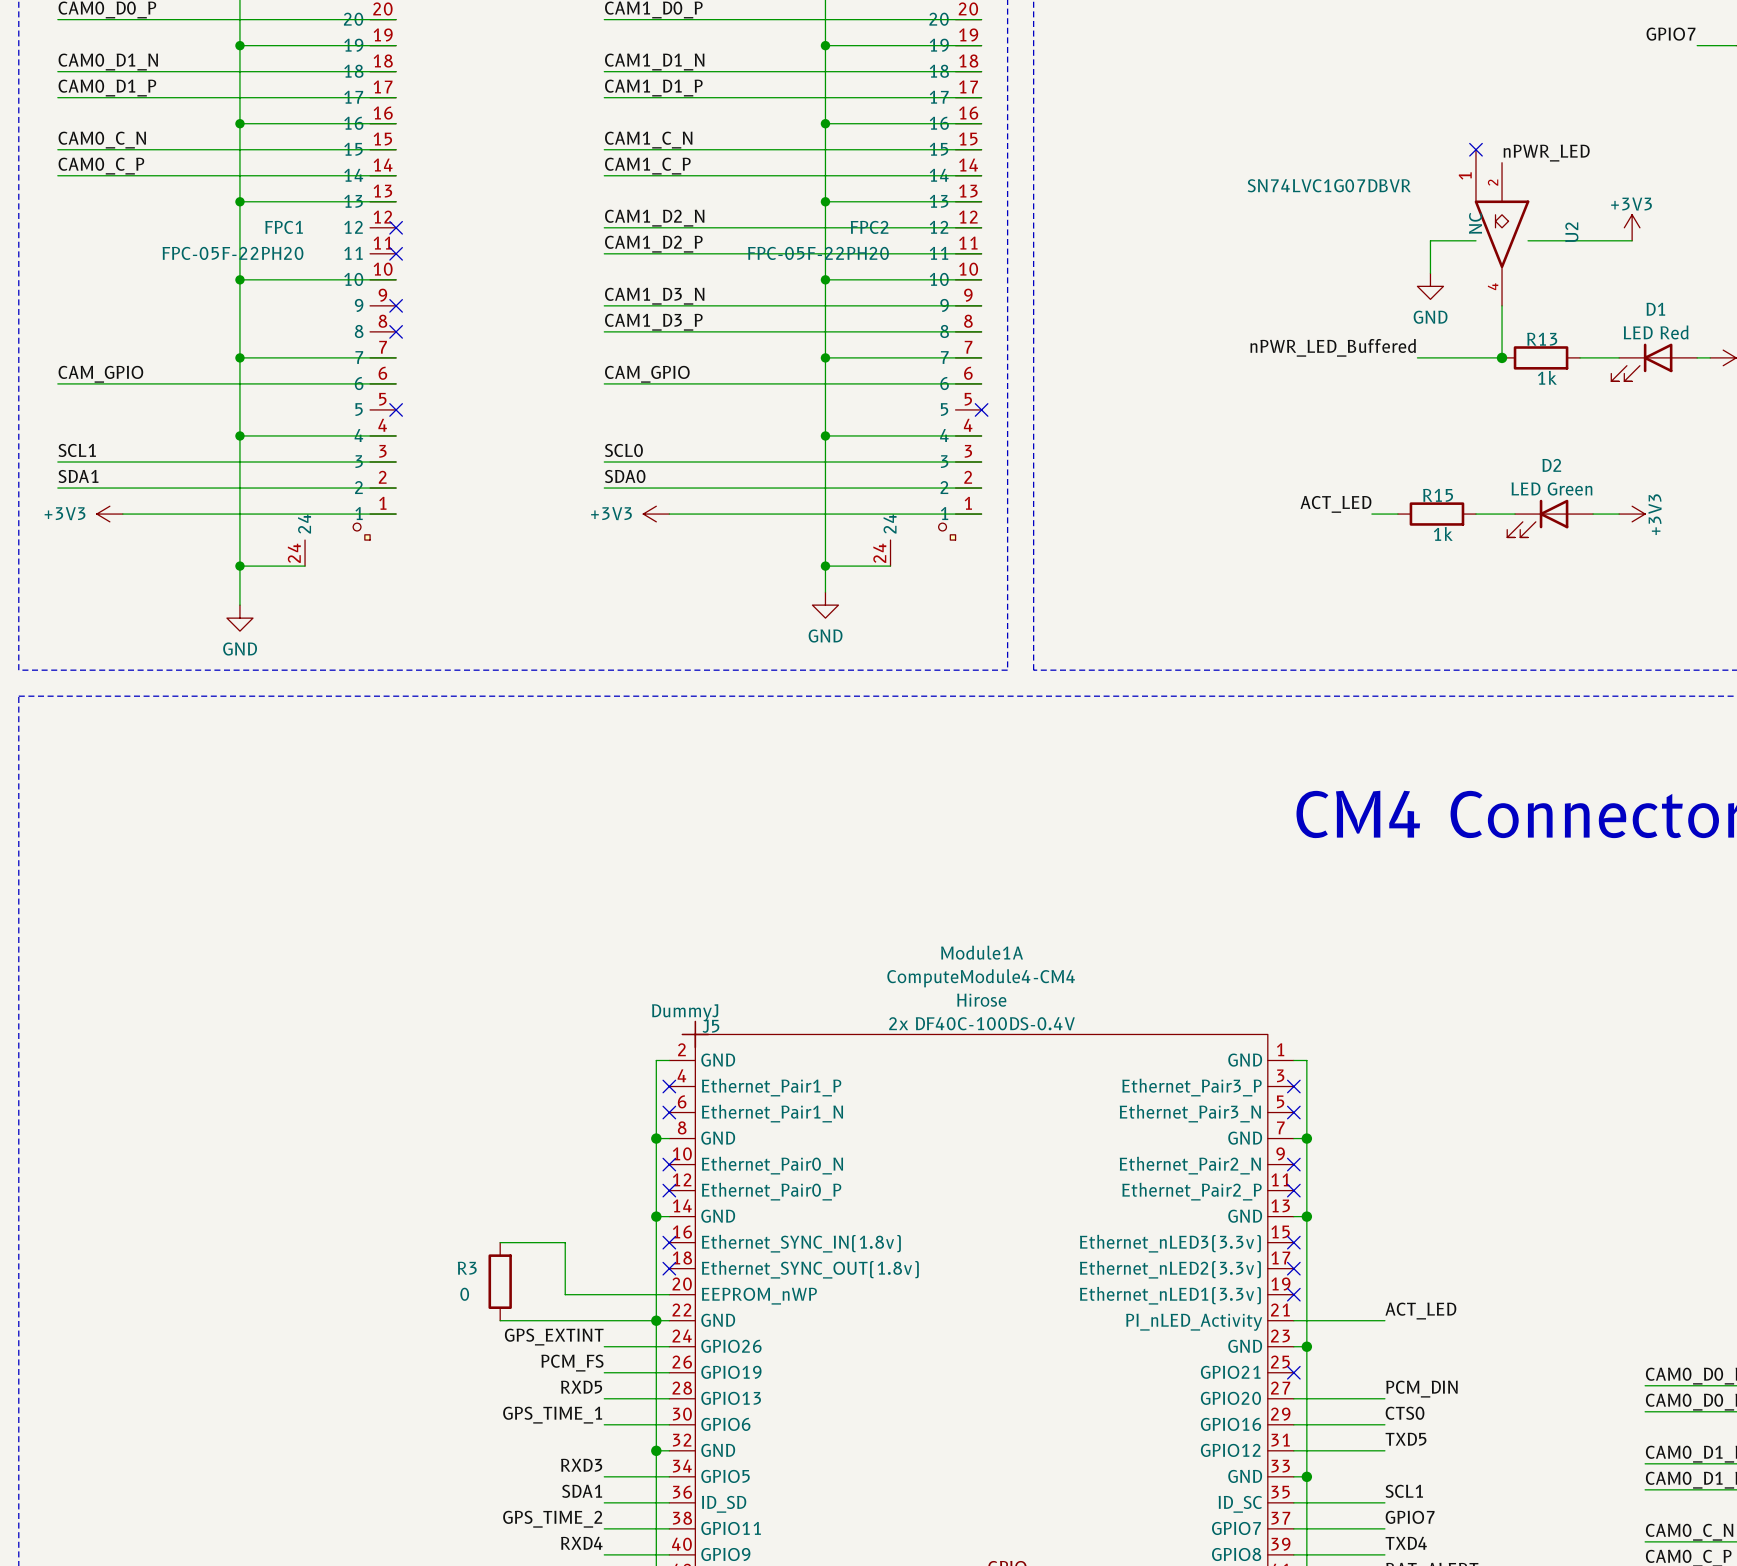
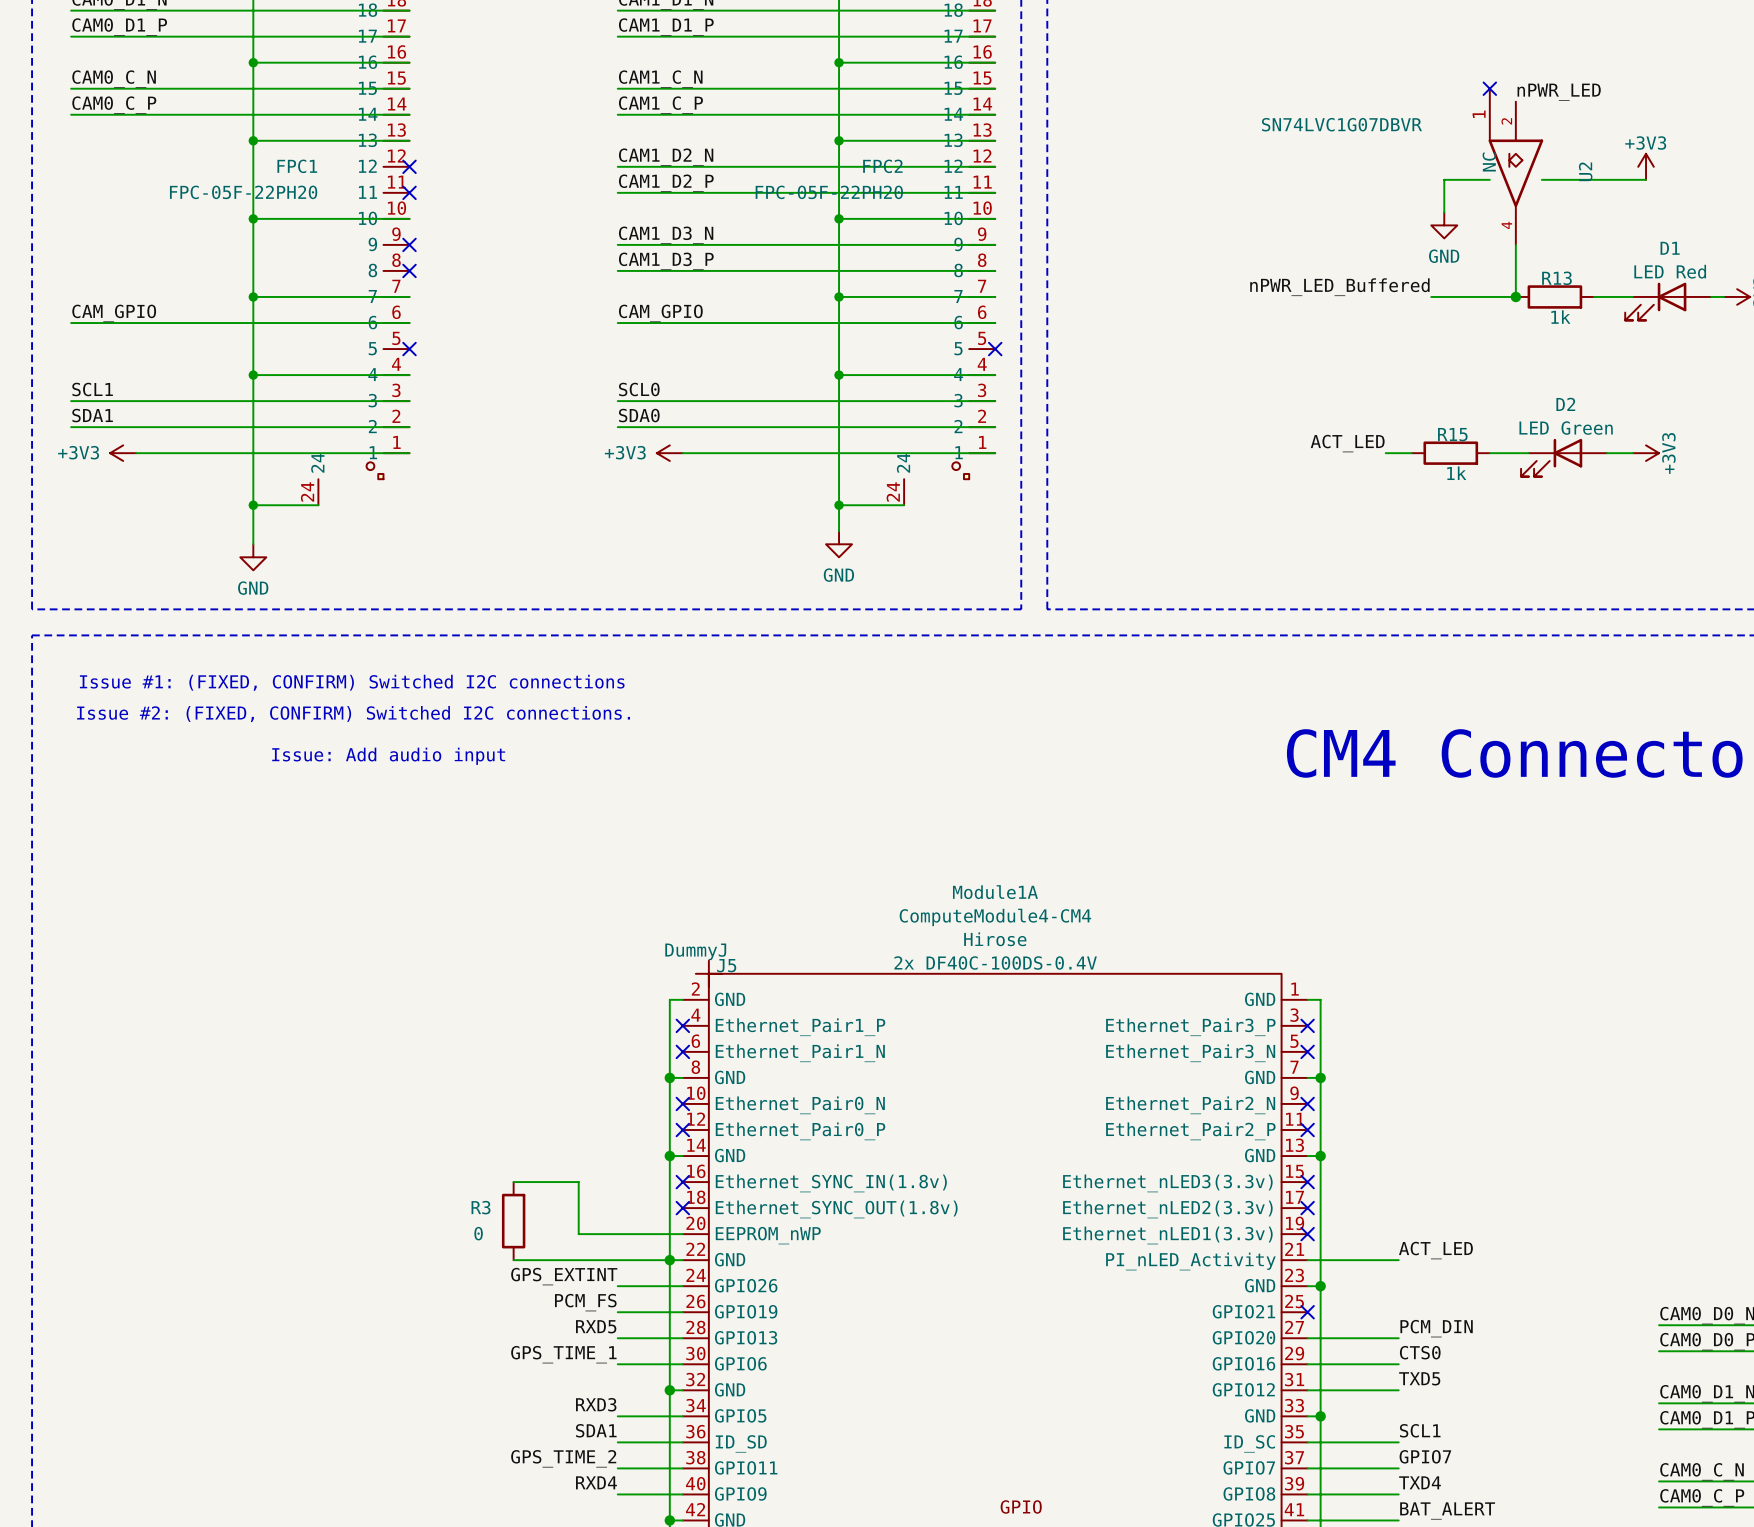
text: none -> Issue #1: (FIXED, CONFIRM) Switched I2C connections (352, 682)
text: none -> Issue #2: (FIXED, CONFIRM) Switched I2C connections. (353, 714)
text: none -> Issue: Add audio input (388, 756)

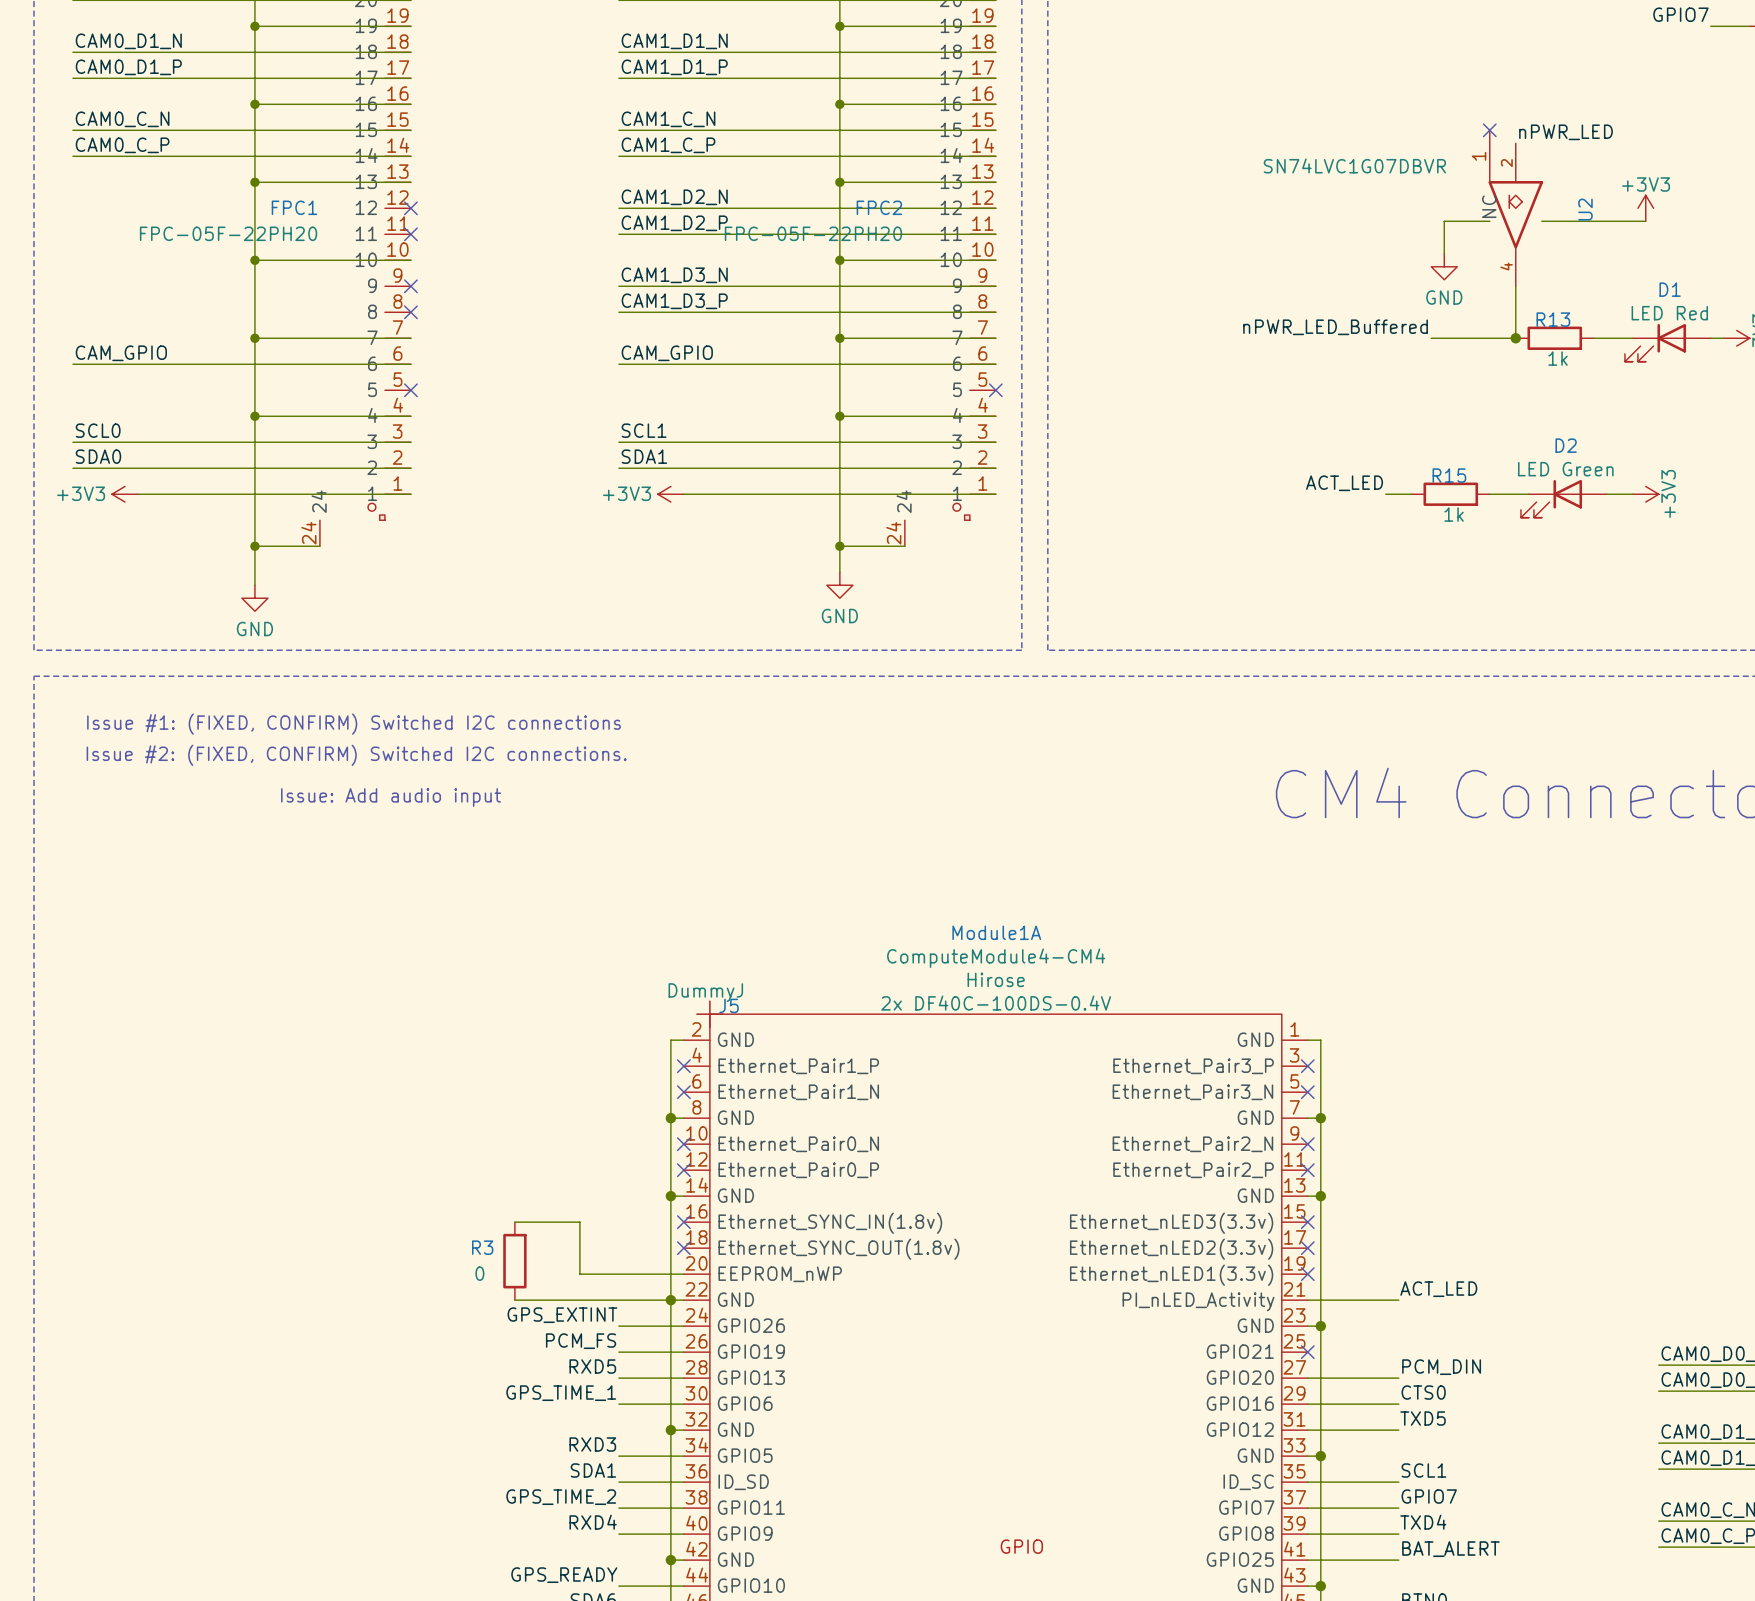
label: SCL1 (92, 389) -> SCL0 (98, 430)
label: SCL0 (639, 389) -> SCL1 (644, 430)
label: SDA1 (92, 415) -> SDA0 (98, 456)
label: SDA0 (639, 415) -> SDA1 (644, 456)

